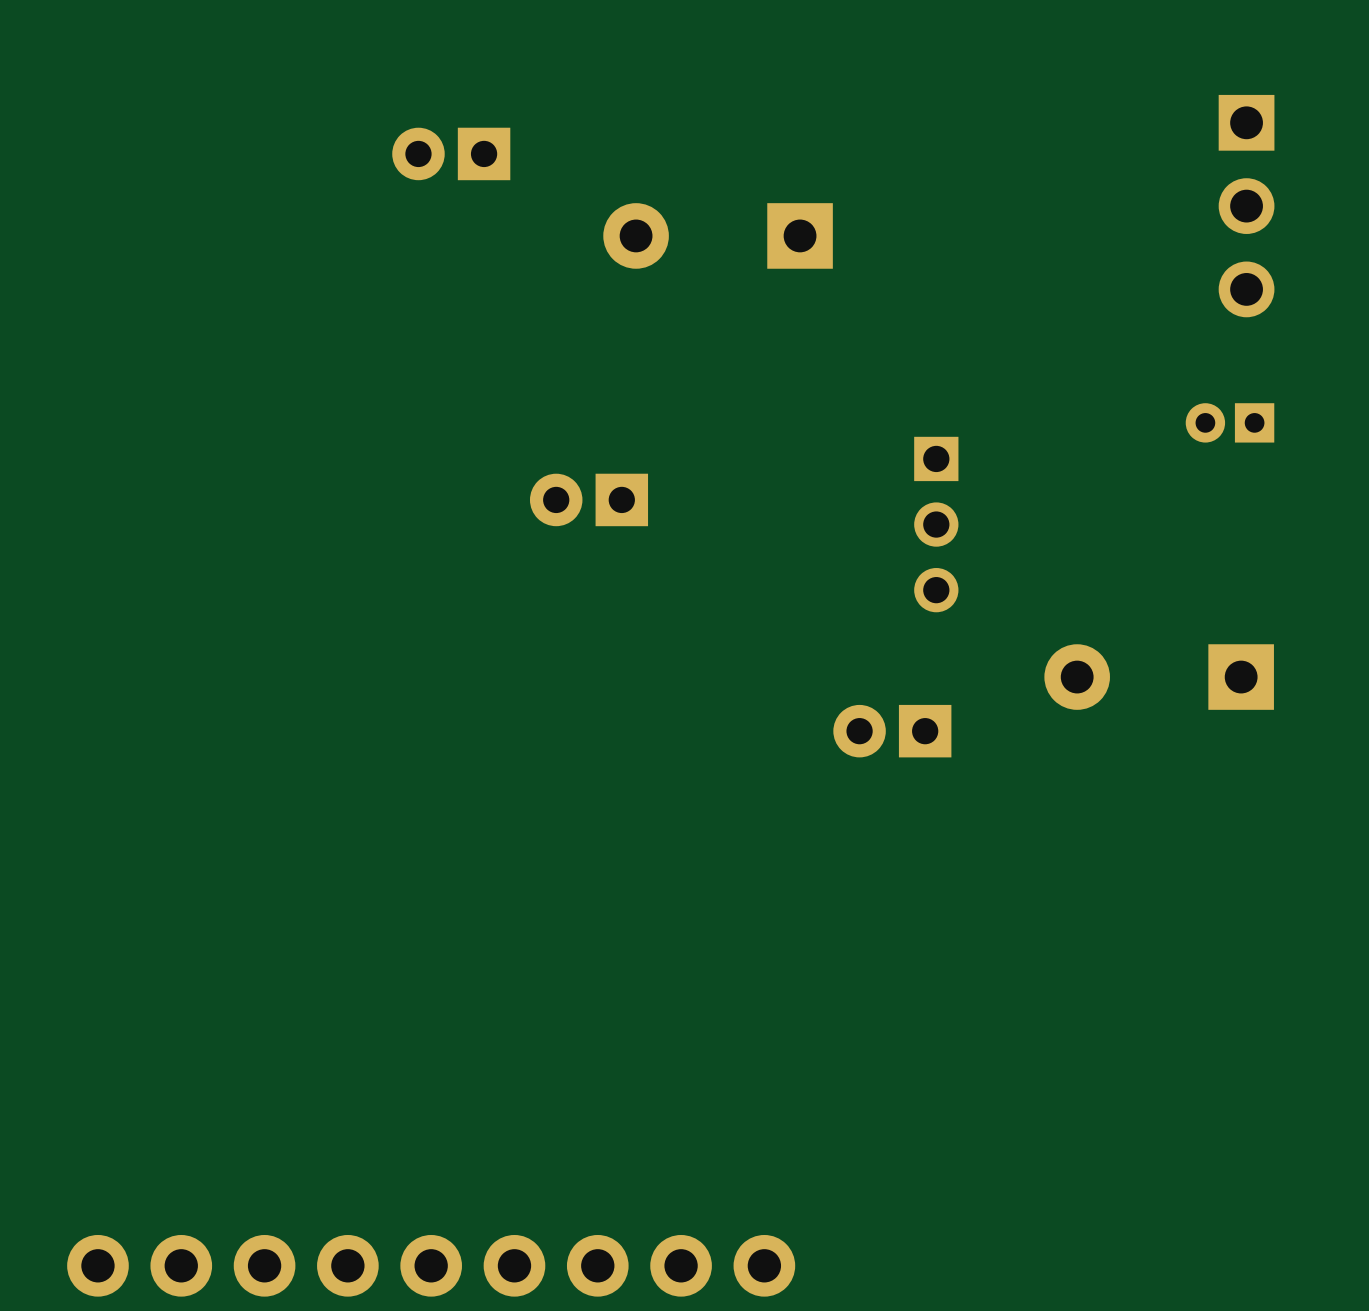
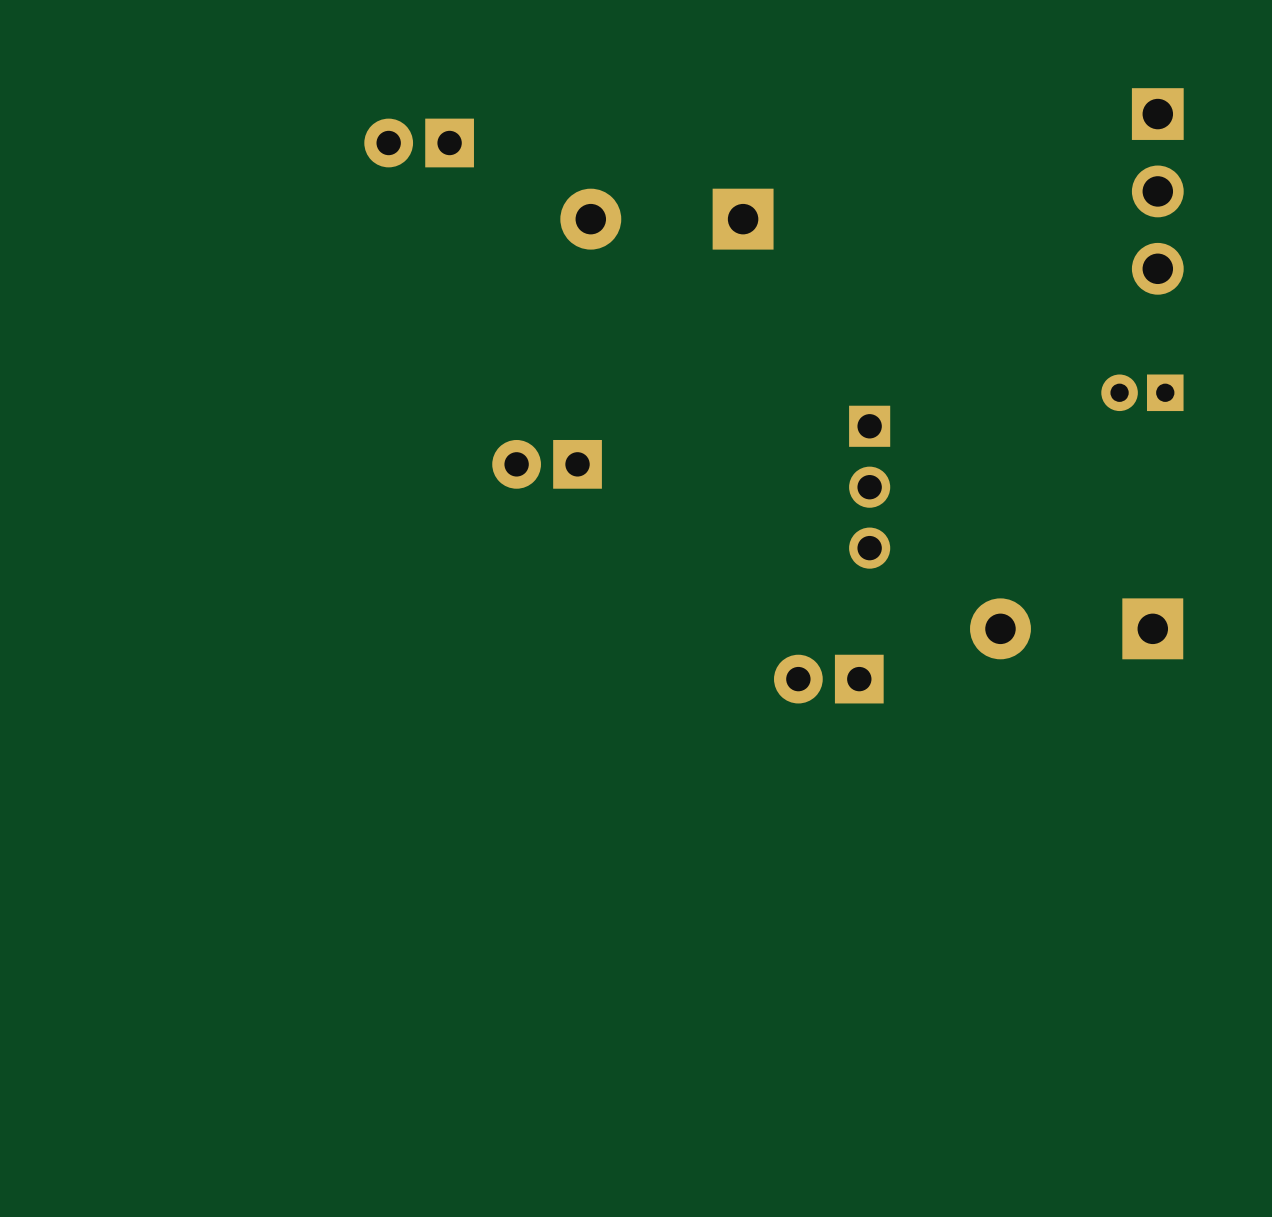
part: (431, 1265) -> none

